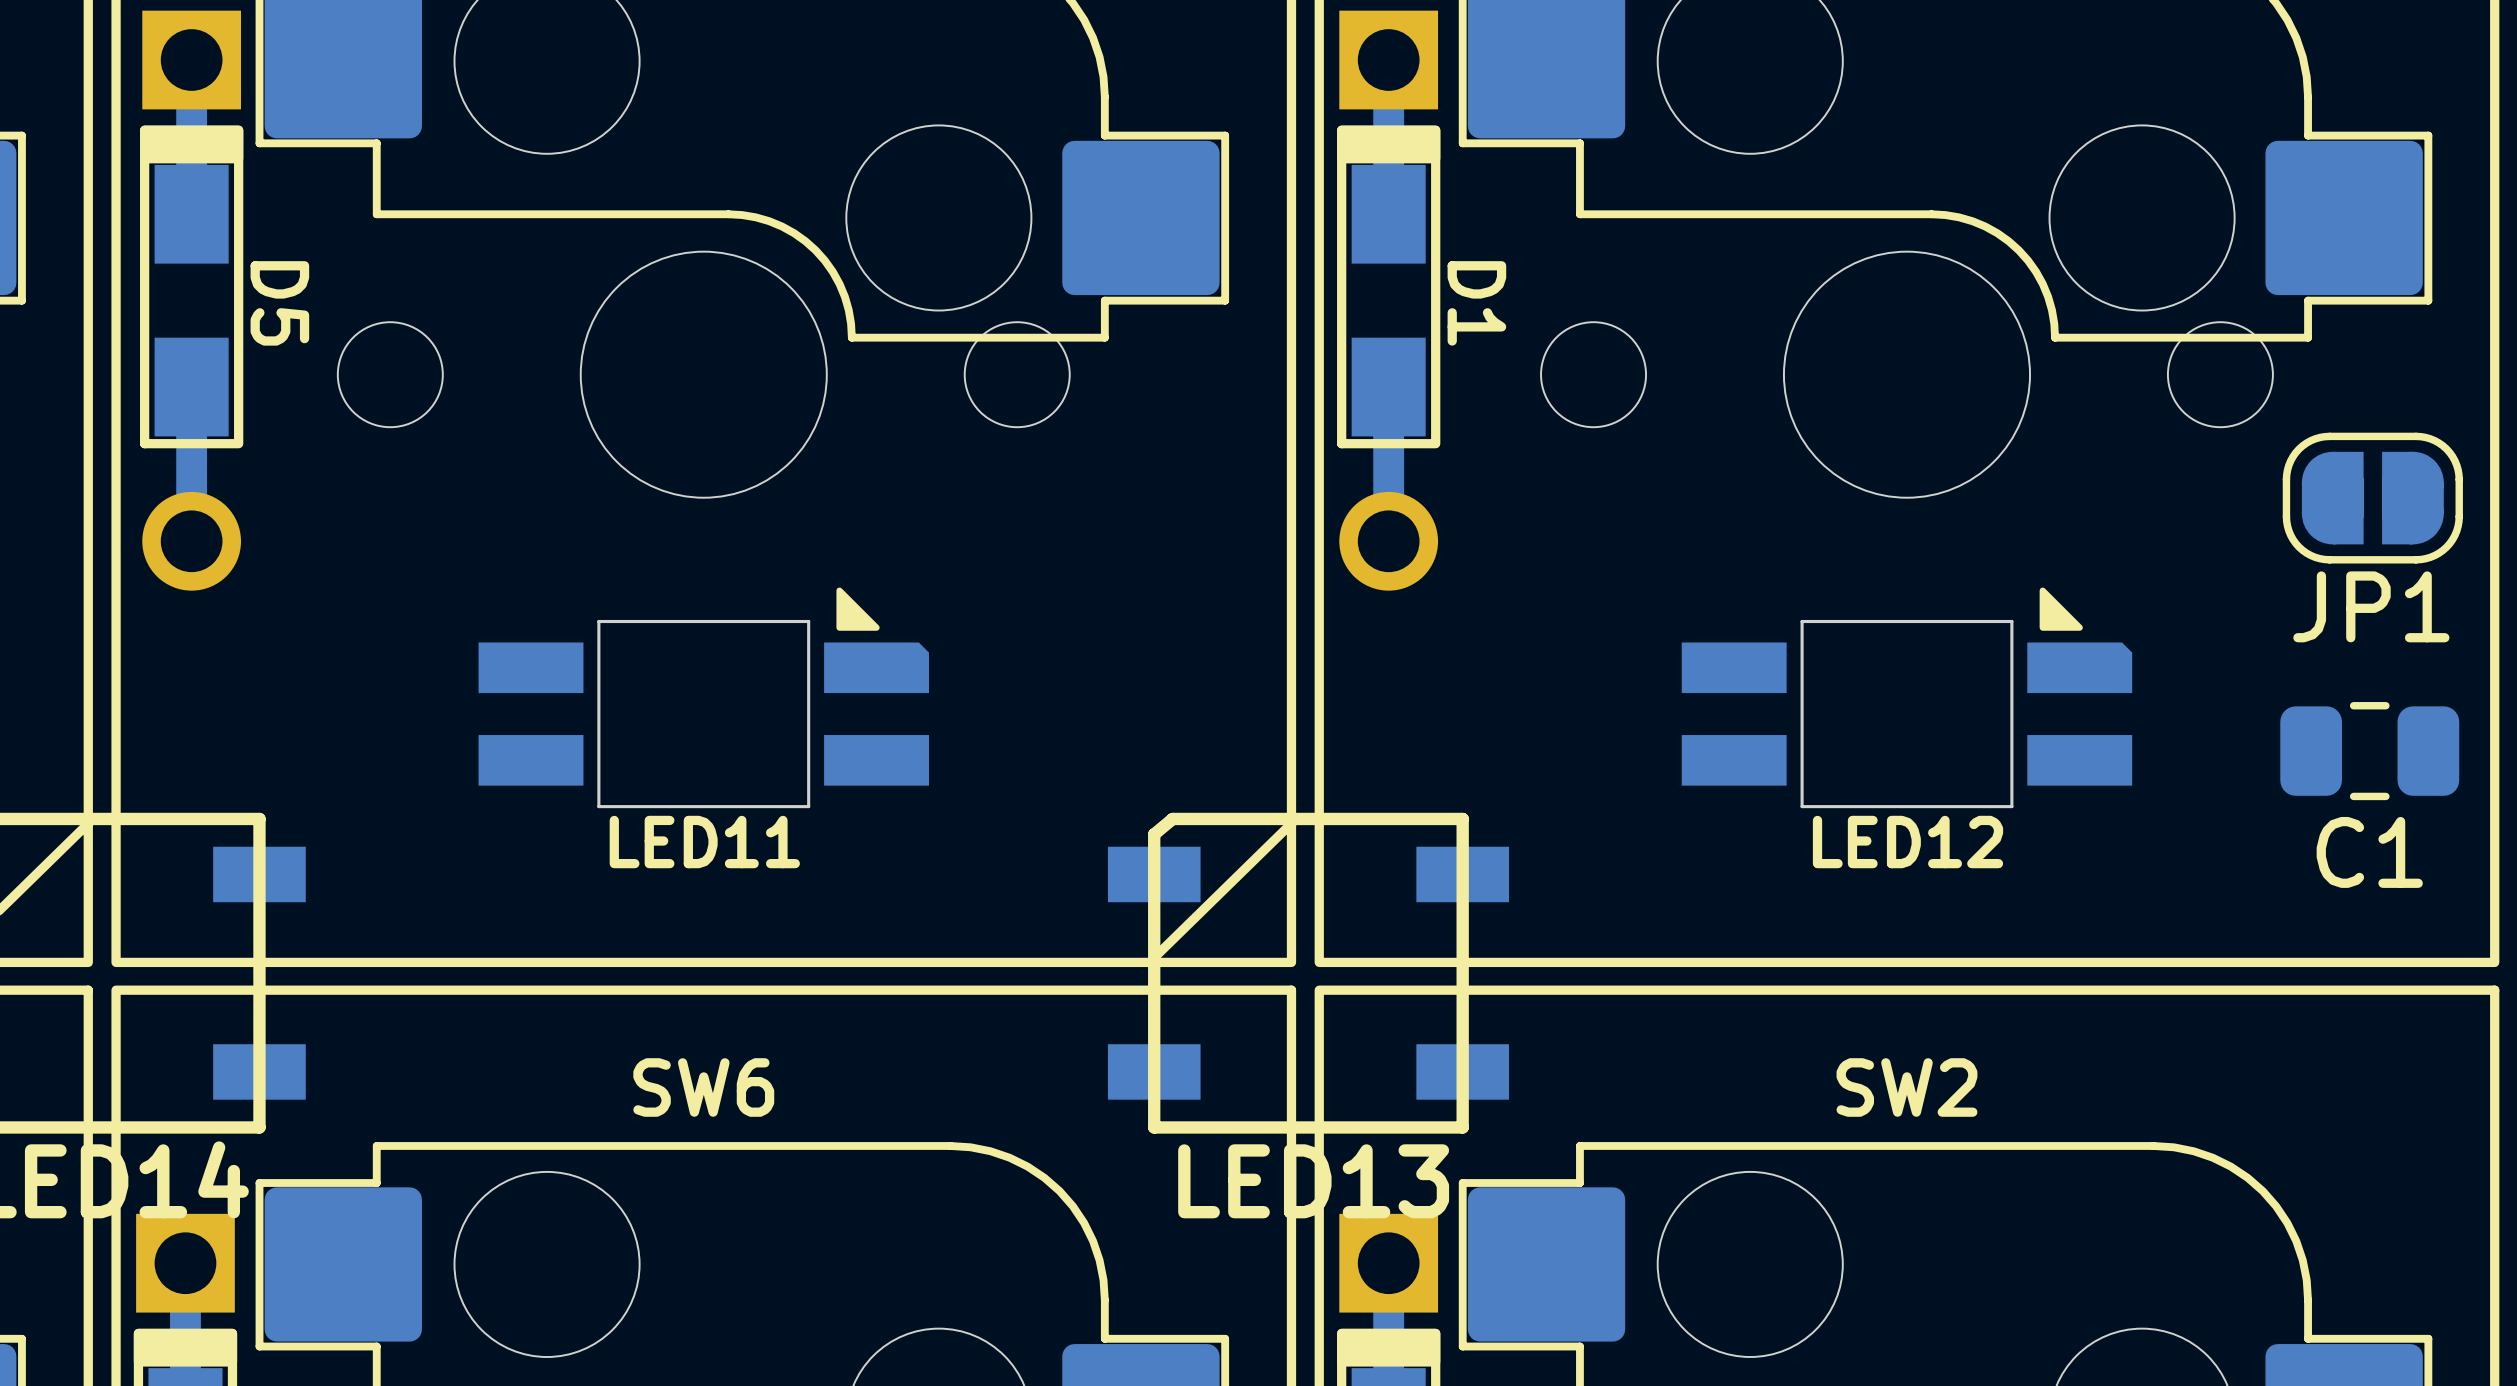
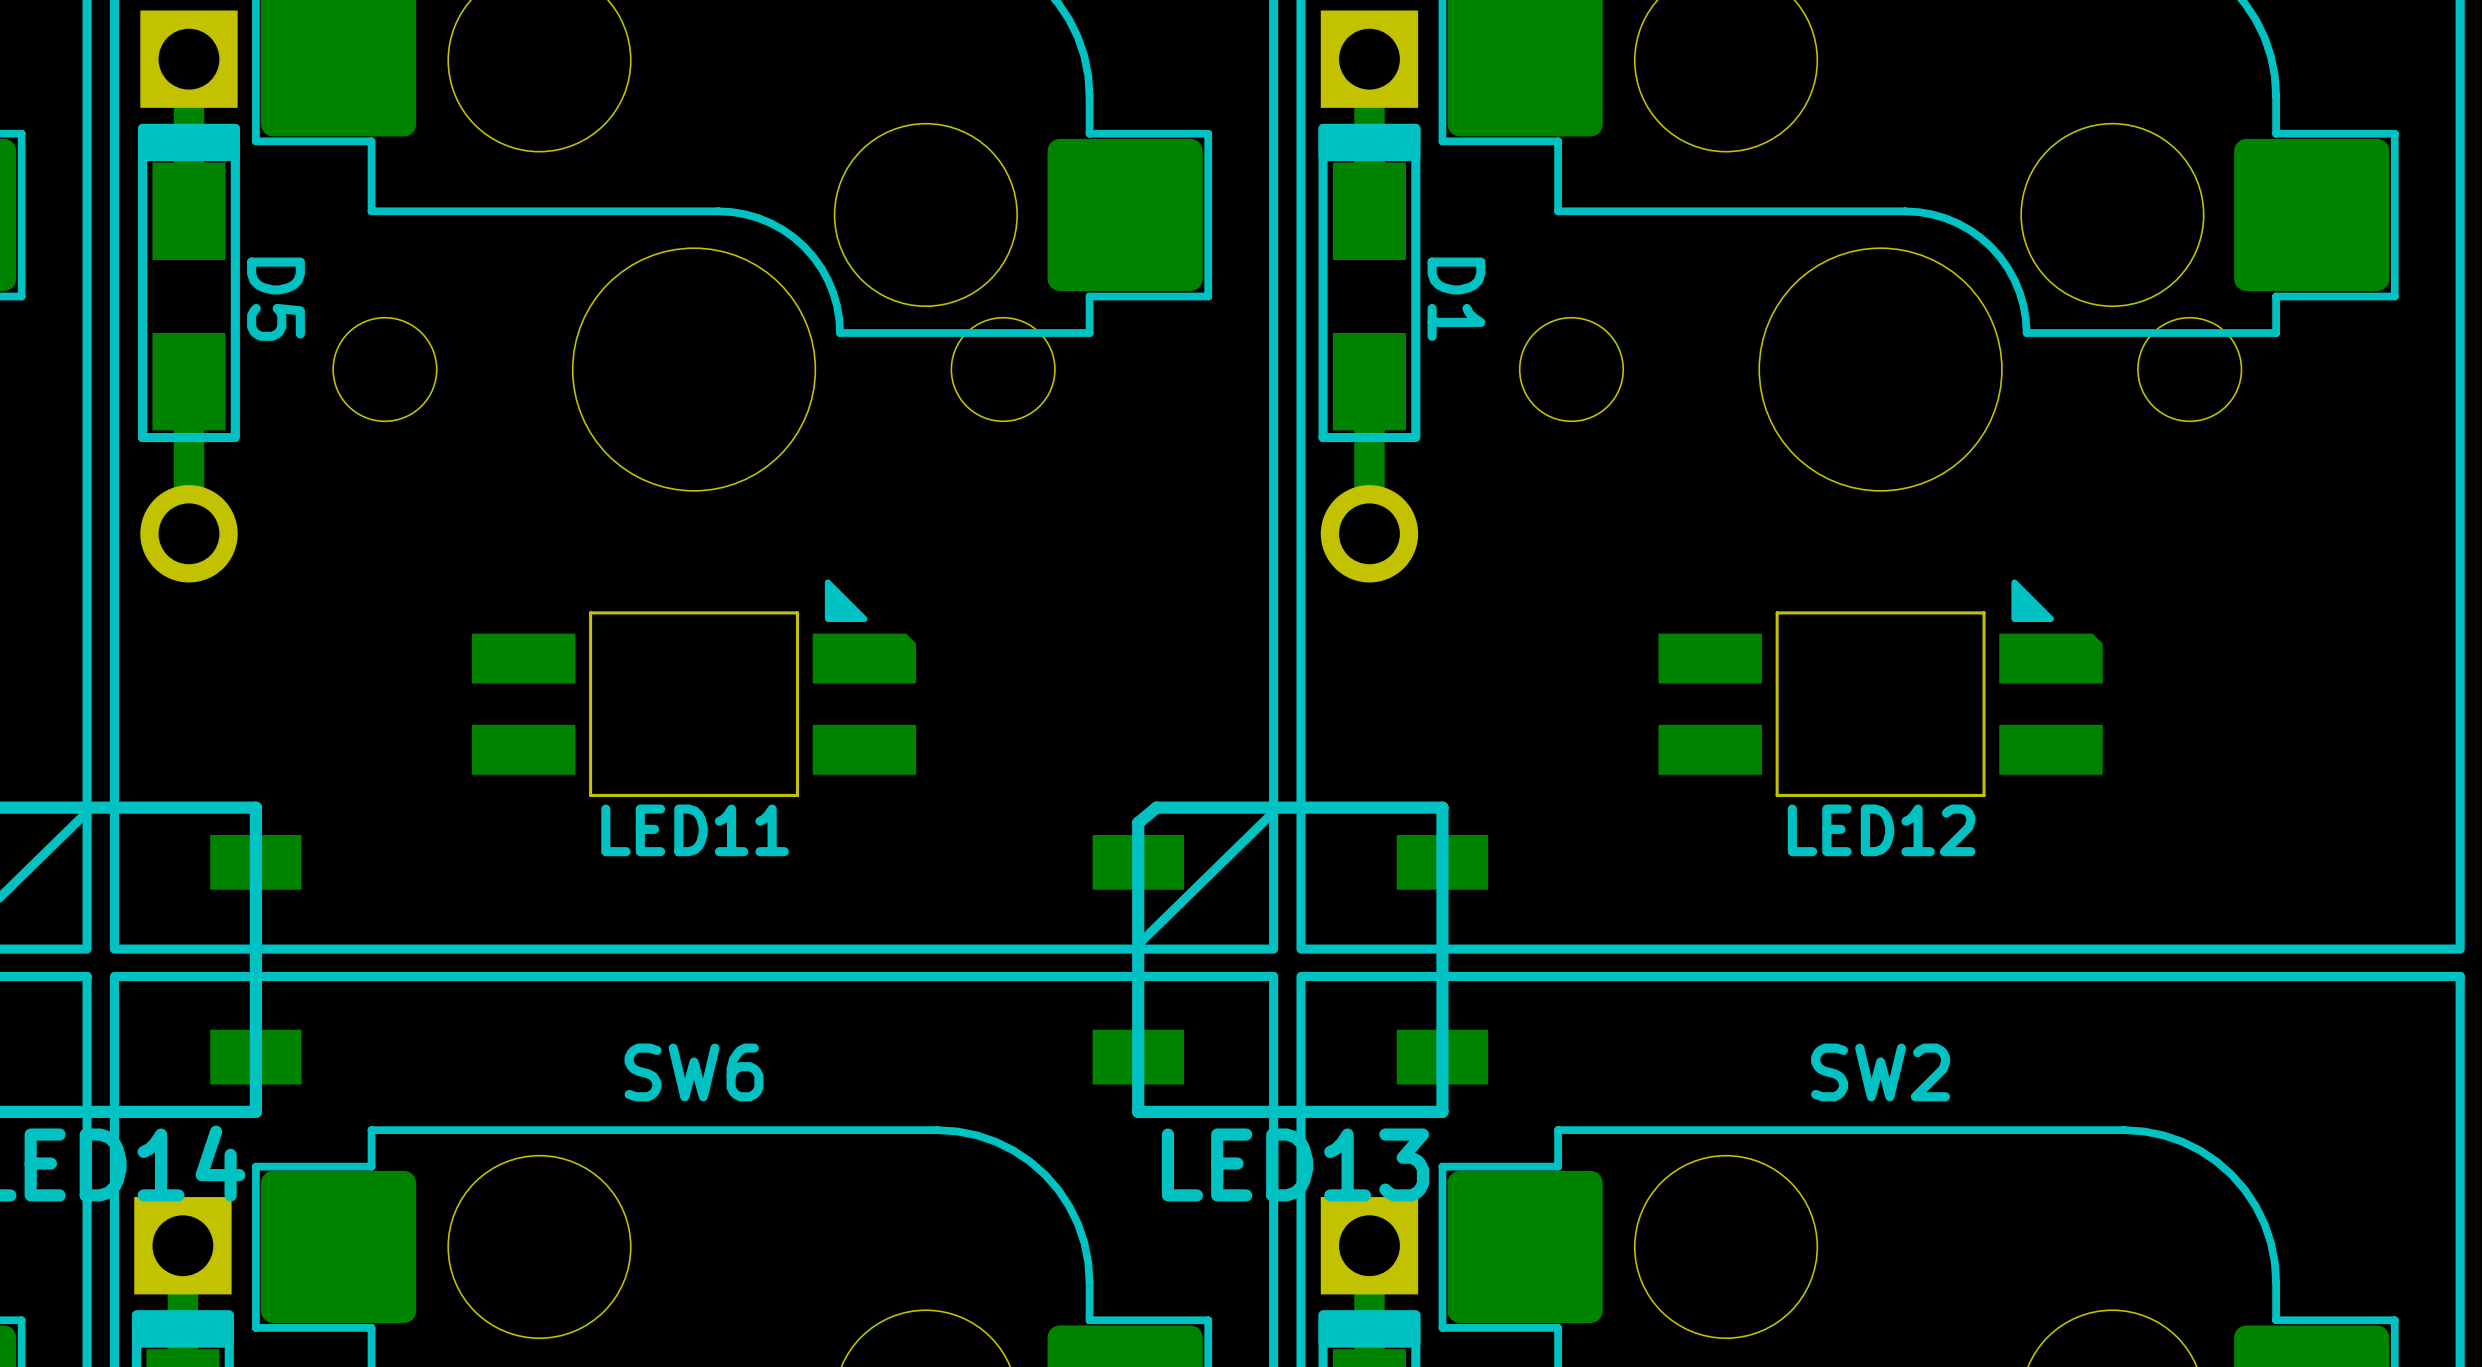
JP1: (2372, 498) -> none
C1: (2369, 751) -> none

